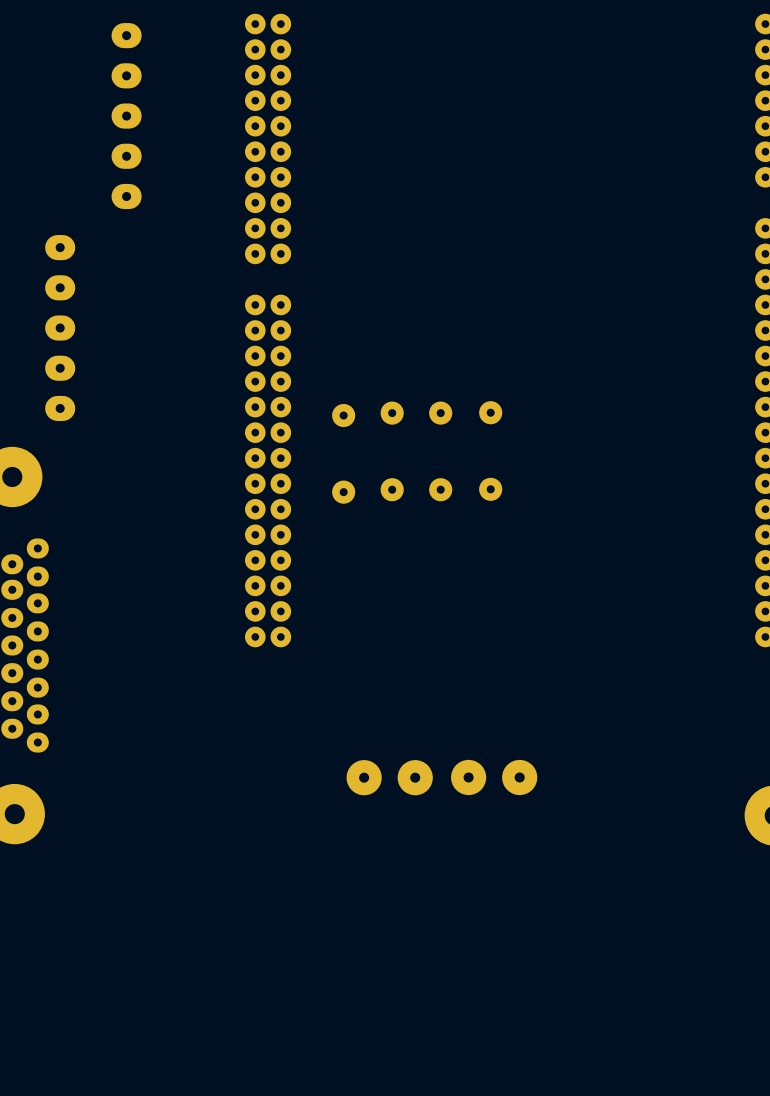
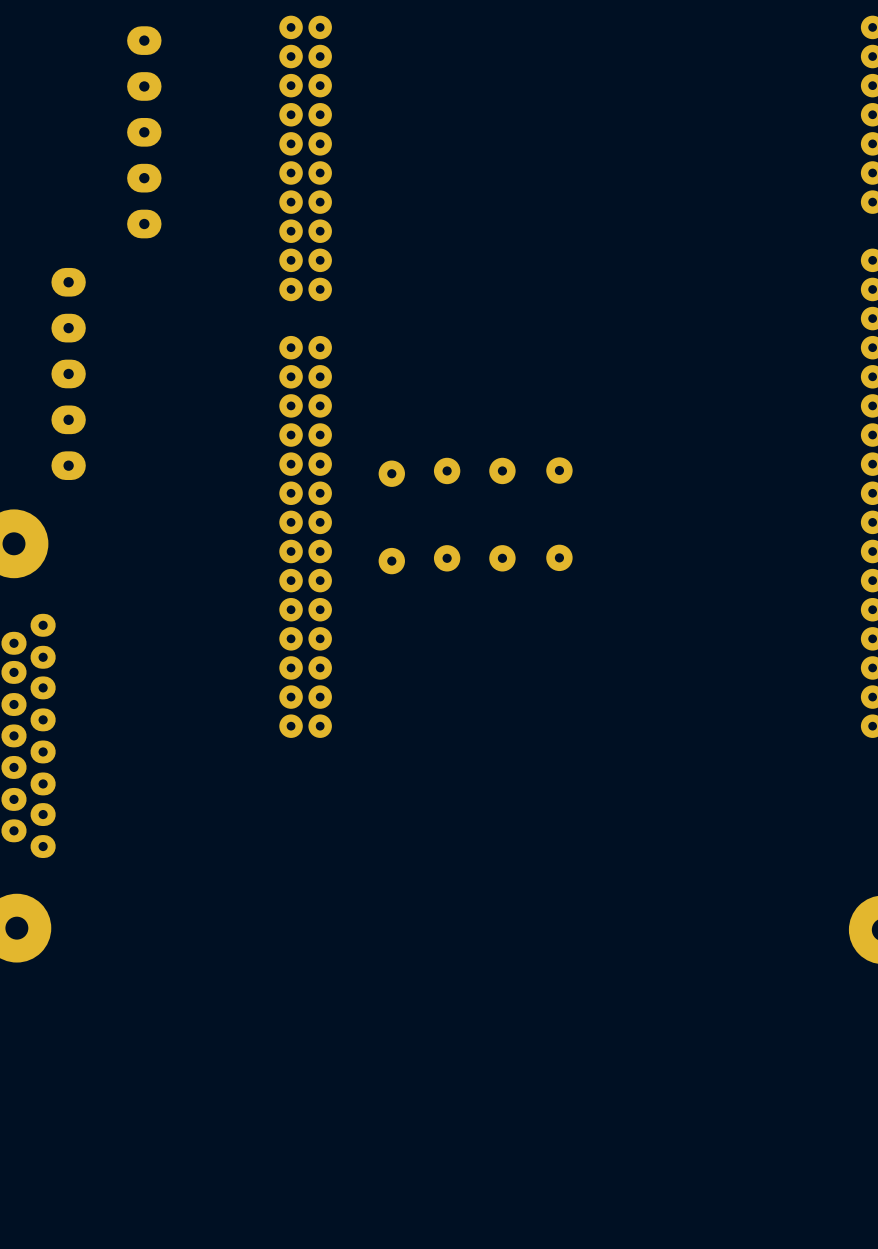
part: (389, 777) -> none
part: (494, 777) -> none

